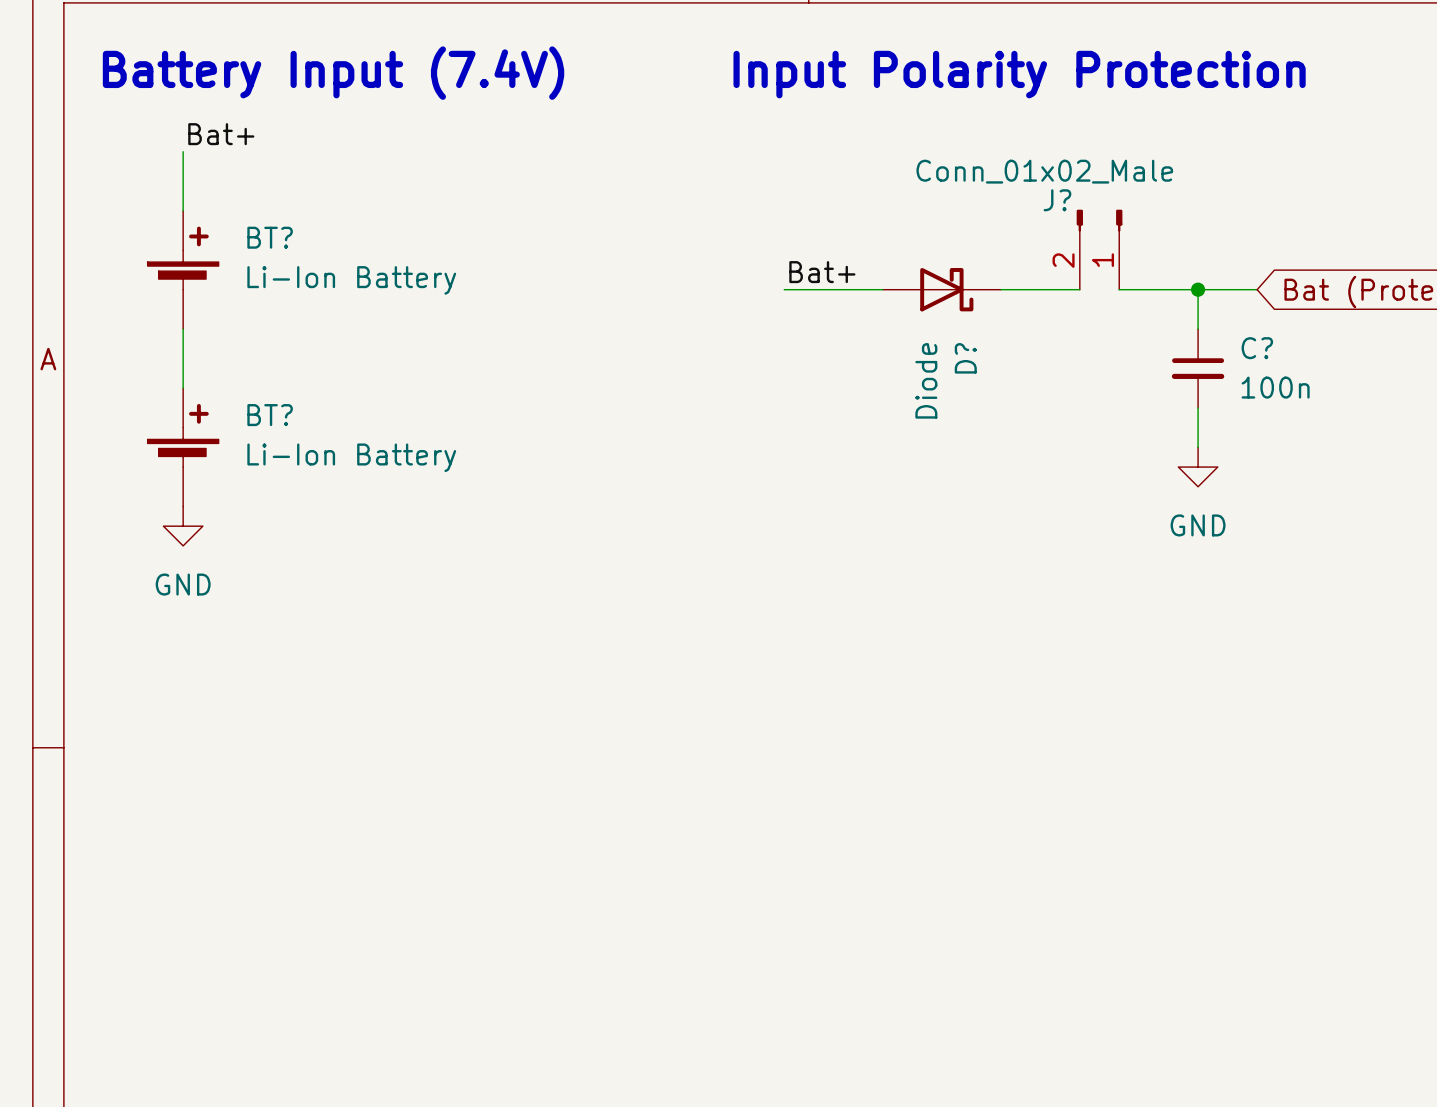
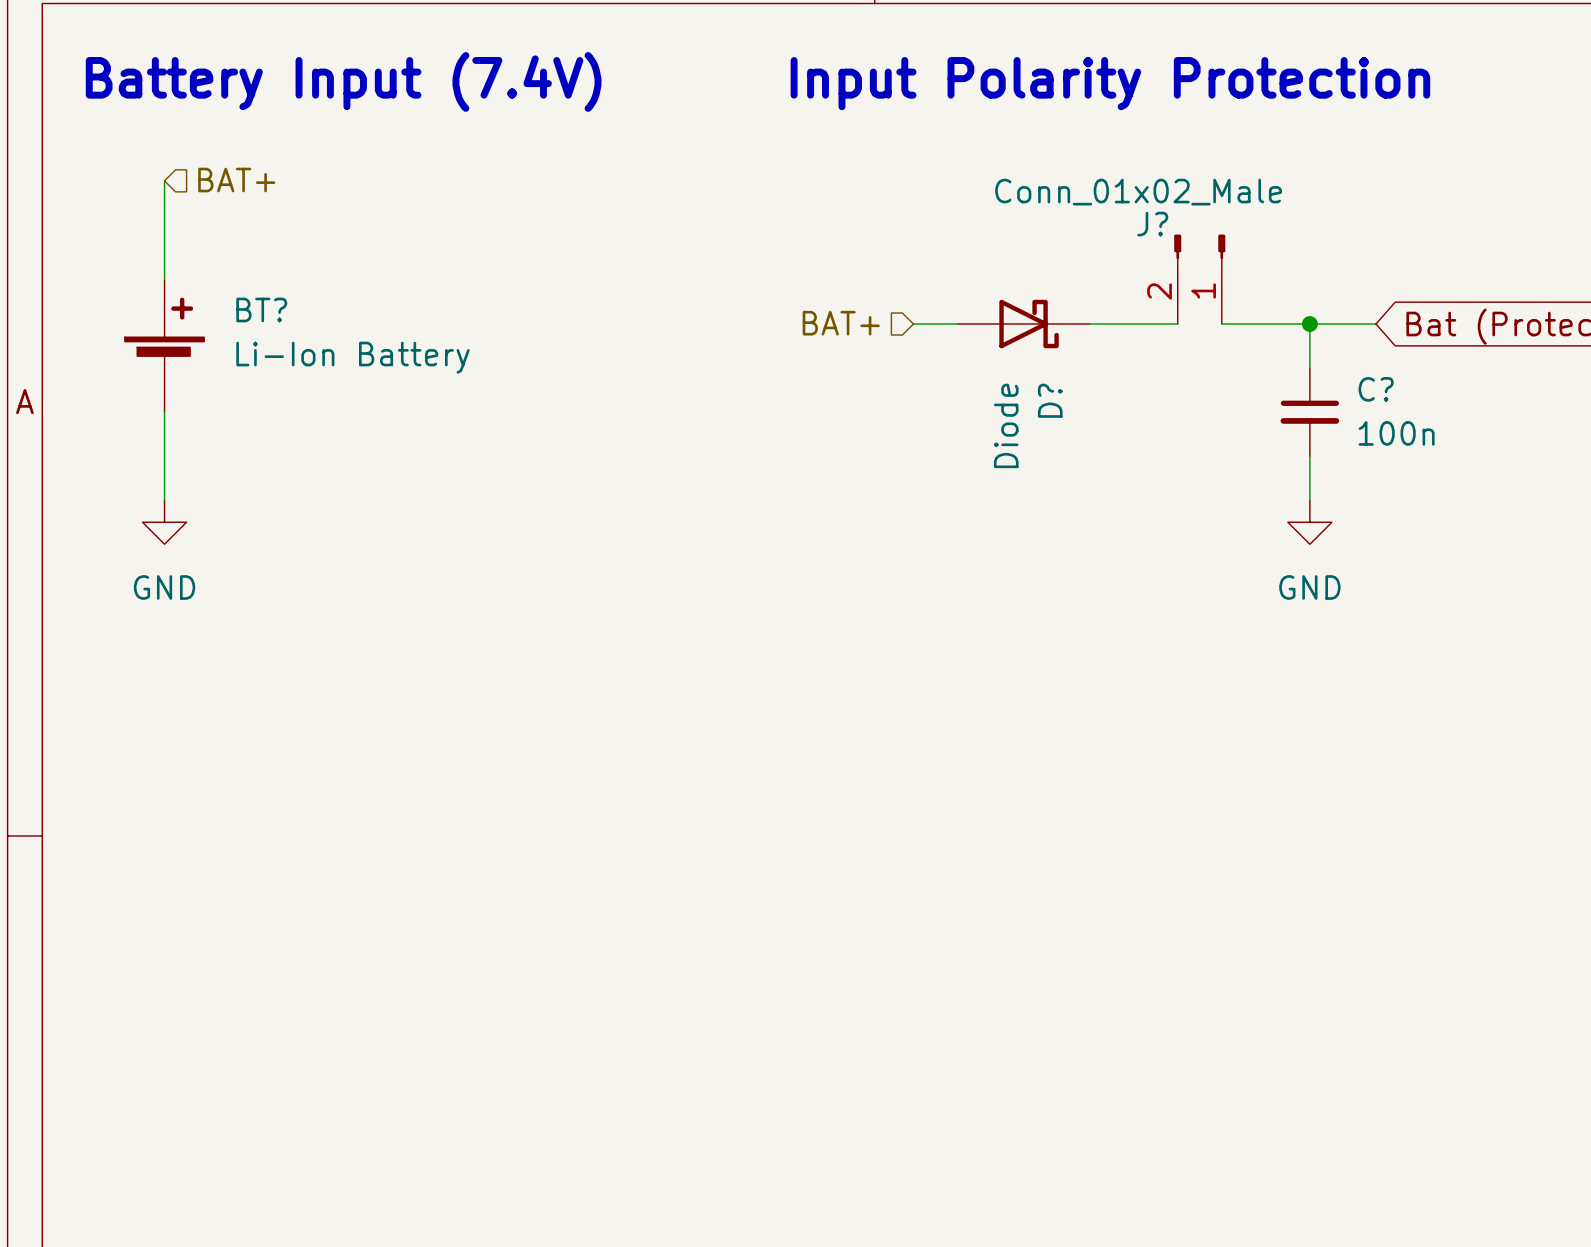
label: Bat+ (221, 134) -> none
wire: (183, 151) (183, 210) -> none
hierarchical label: none -> BAT+ (236, 180)
wire: none -> (164, 180) (164, 279)
BT? position: (183, 269) -> (164, 346)
label: Bat+ (822, 272) -> none
hierarchical label: none -> BAT+ (841, 323)
wire: (784, 289) (843, 289) -> none
wire: (183, 329) (183, 388) -> none
wire: none -> (164, 412) (164, 500)
BT?: Li-Ion Battery (183, 447) -> none
power symbol position: GND (183, 526) -> GND (164, 522)

